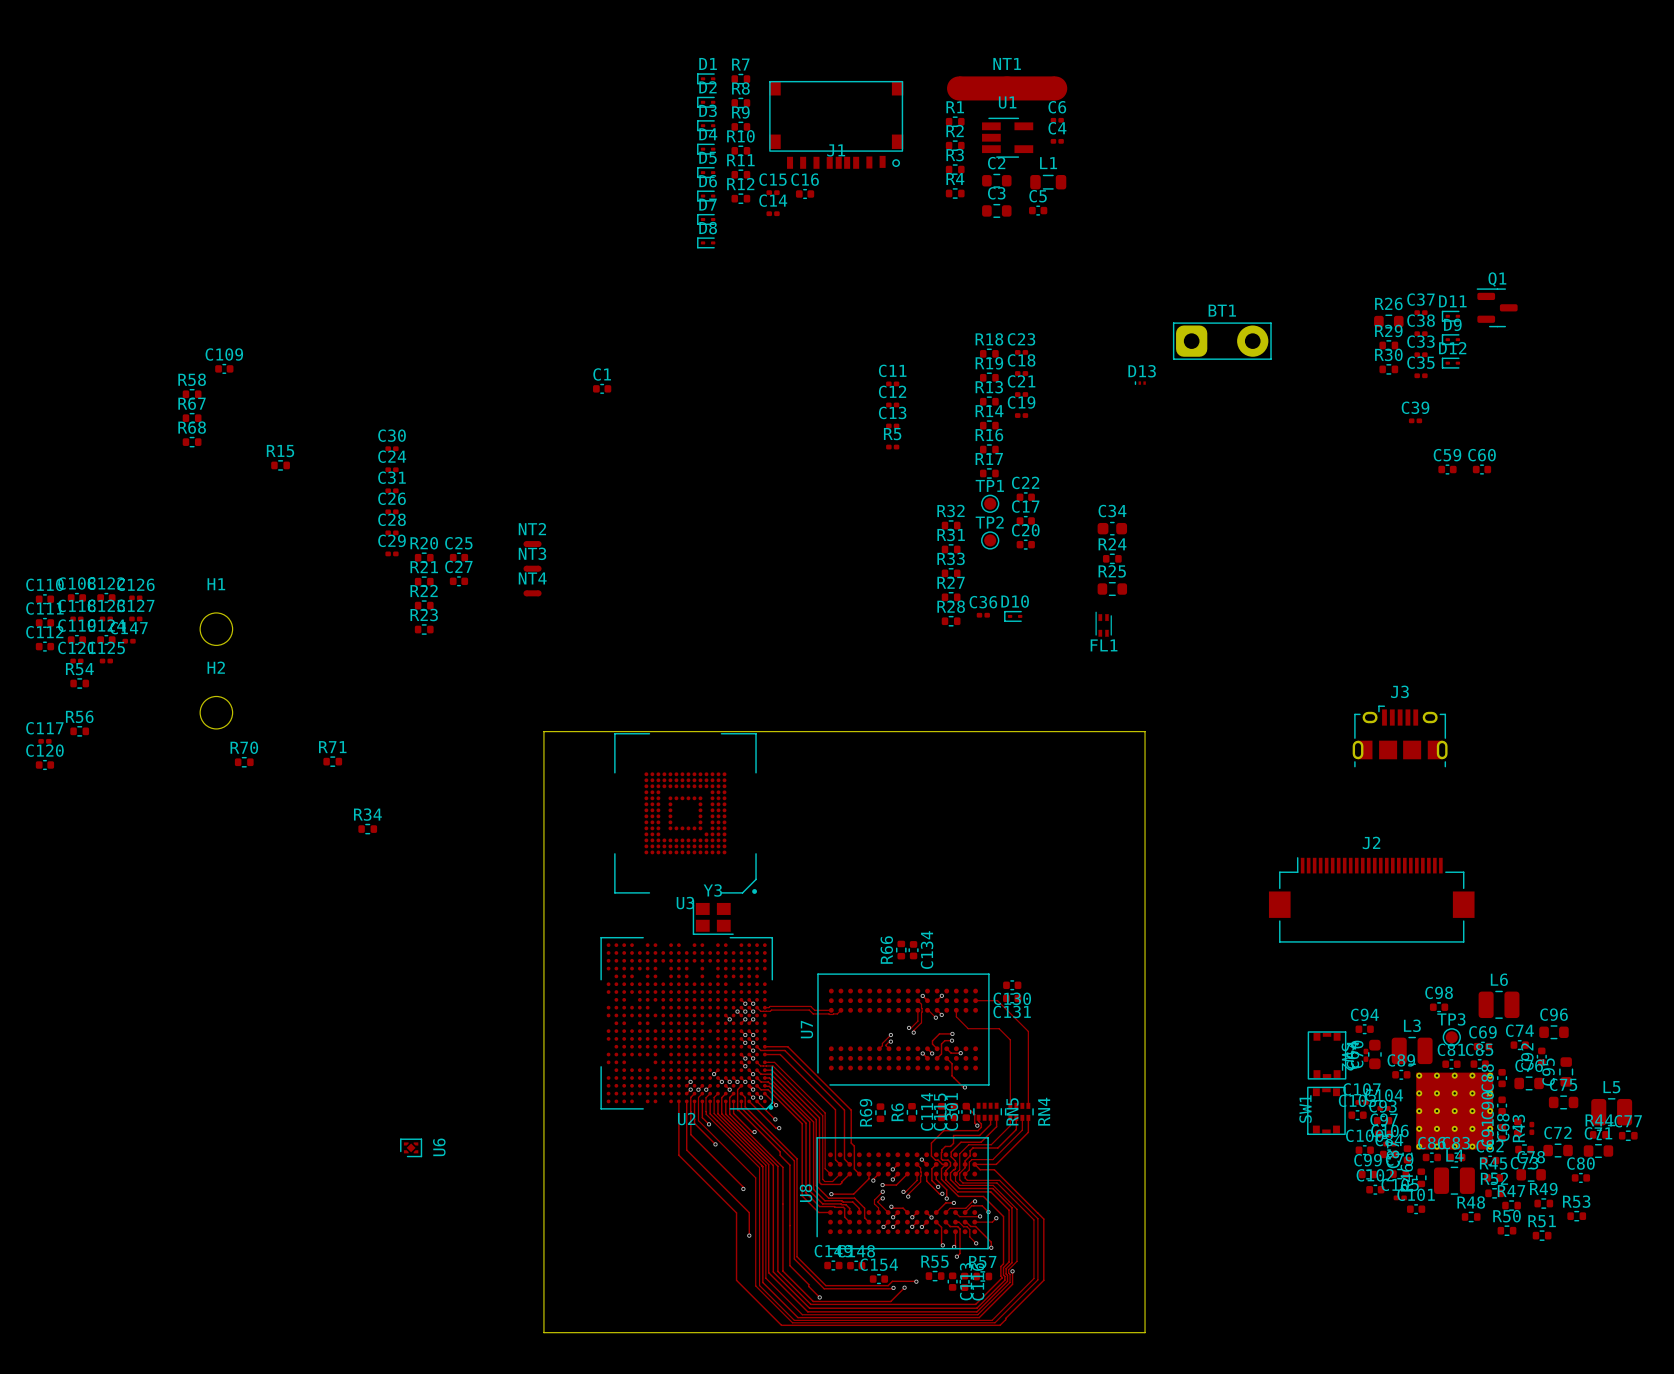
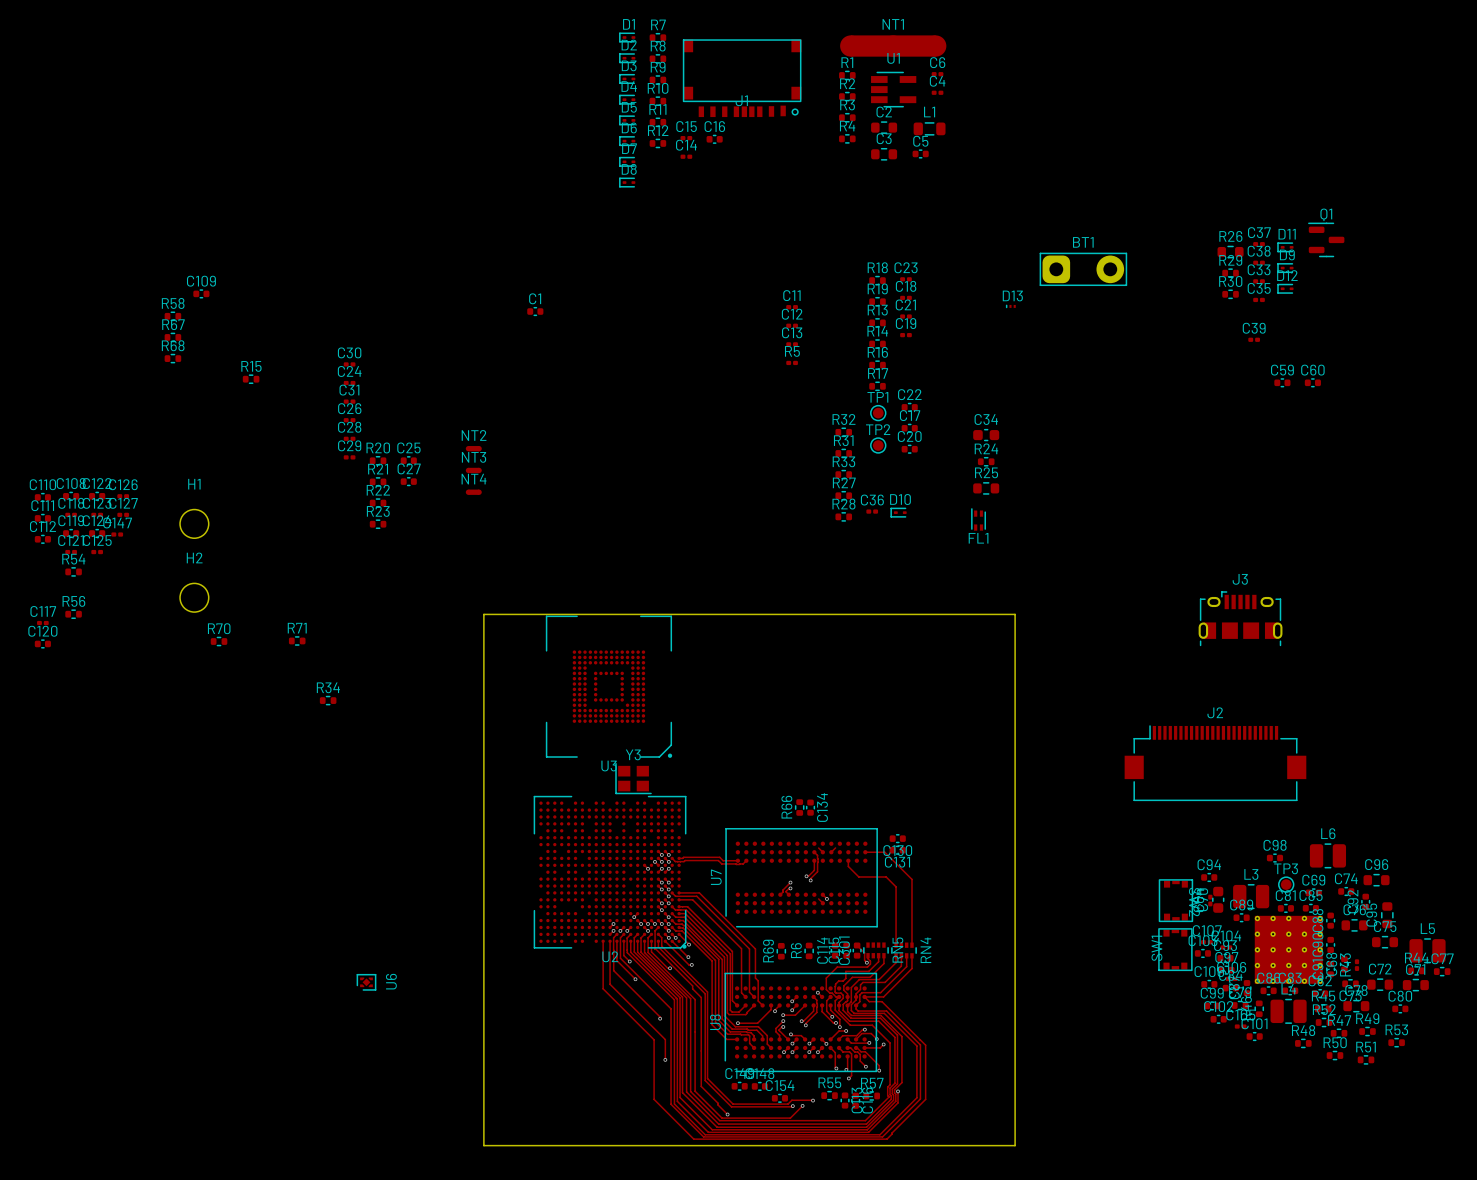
via: (922, 995) -> none
via: (941, 995) -> none
track: (927, 1010) (935, 1017) -> none
track: (937, 1010) (941, 1015) -> none
via: (941, 1014) -> none
via: (935, 1017) -> none
track: (952, 1033) (939, 1033) (932, 1040) (932, 1044) (937, 1048) -> none
via: (952, 1033) -> none
track: (952, 1040) (944, 1040) (941, 1044) (941, 1054) (937, 1058) -> none
via: (952, 1040) -> none
track: (946, 1048) (951, 1053) (960, 1053) -> none
via: (922, 1053) -> none
via: (960, 1053) -> none
track: (946, 1058) (952, 1063) (952, 1075) (964, 1087) -> none
via: (964, 1087) -> none

